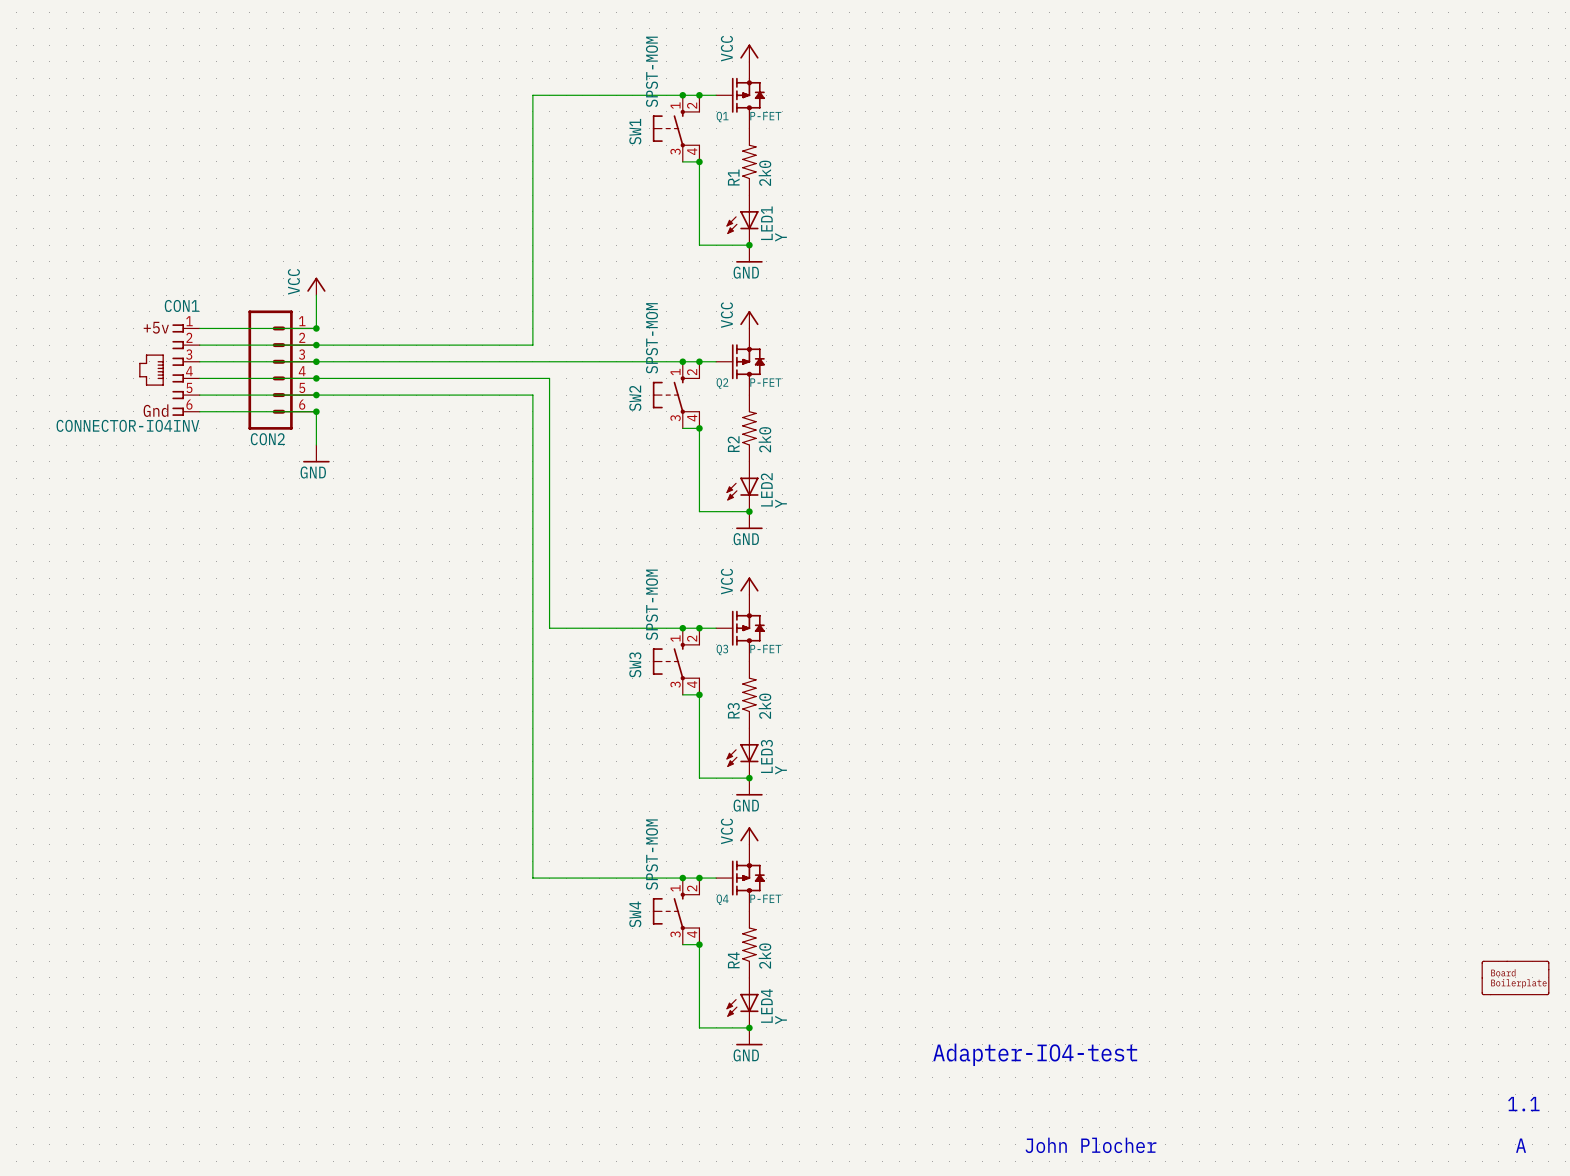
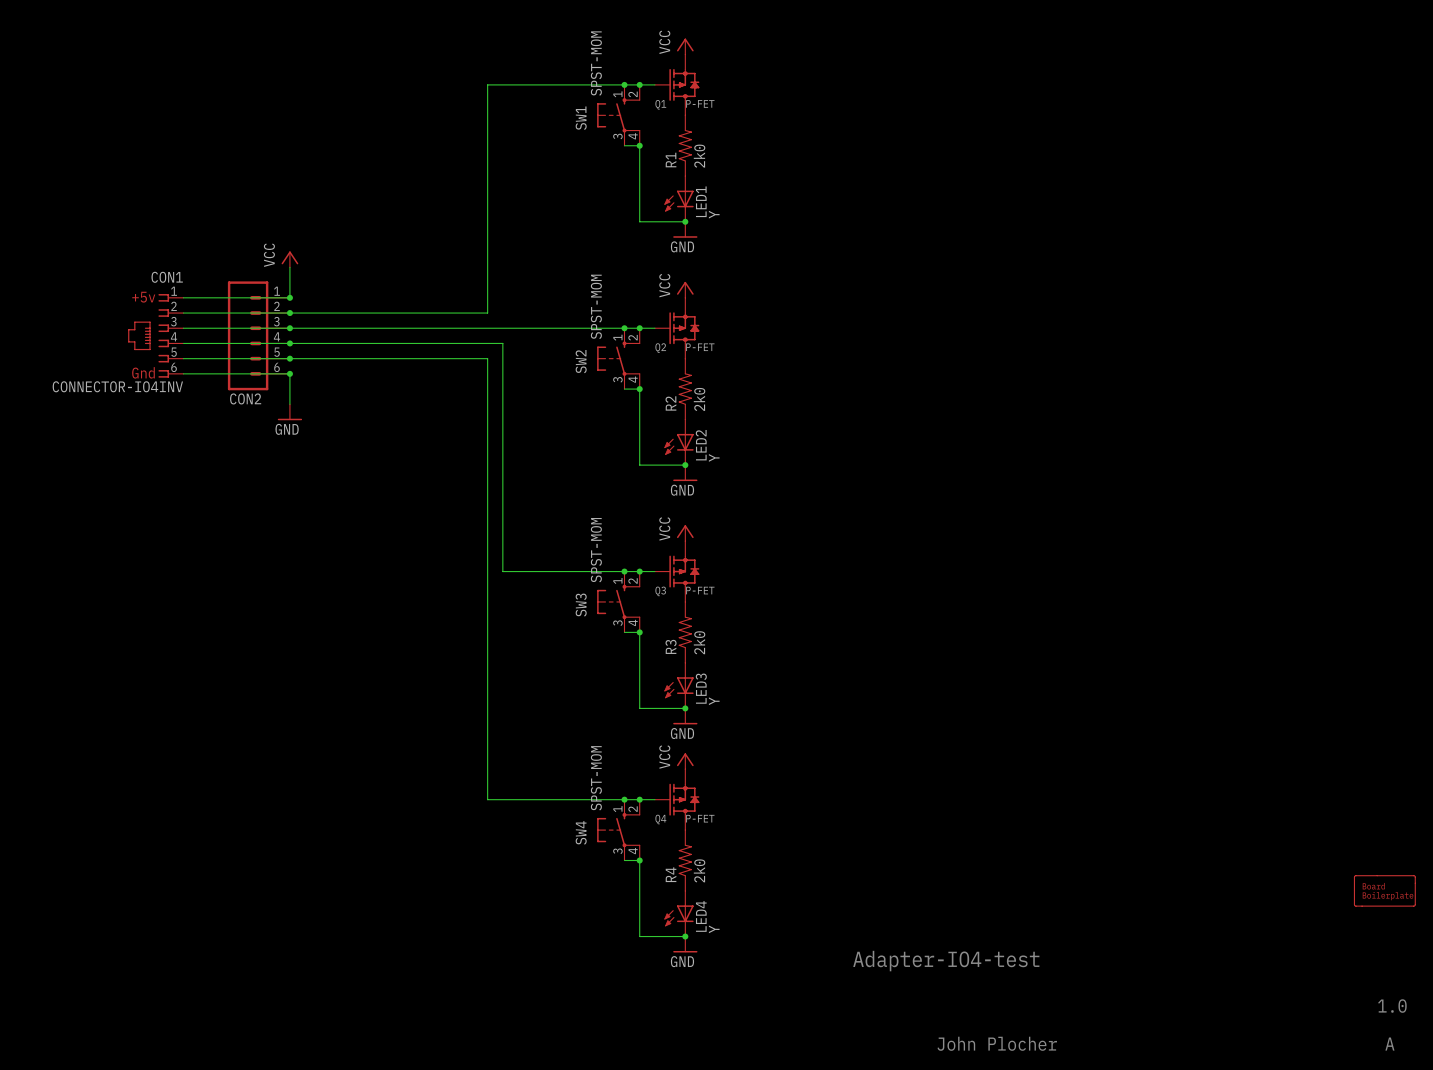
text: 1.1 (1523, 1104) -> 1.0 (1392, 1006)

